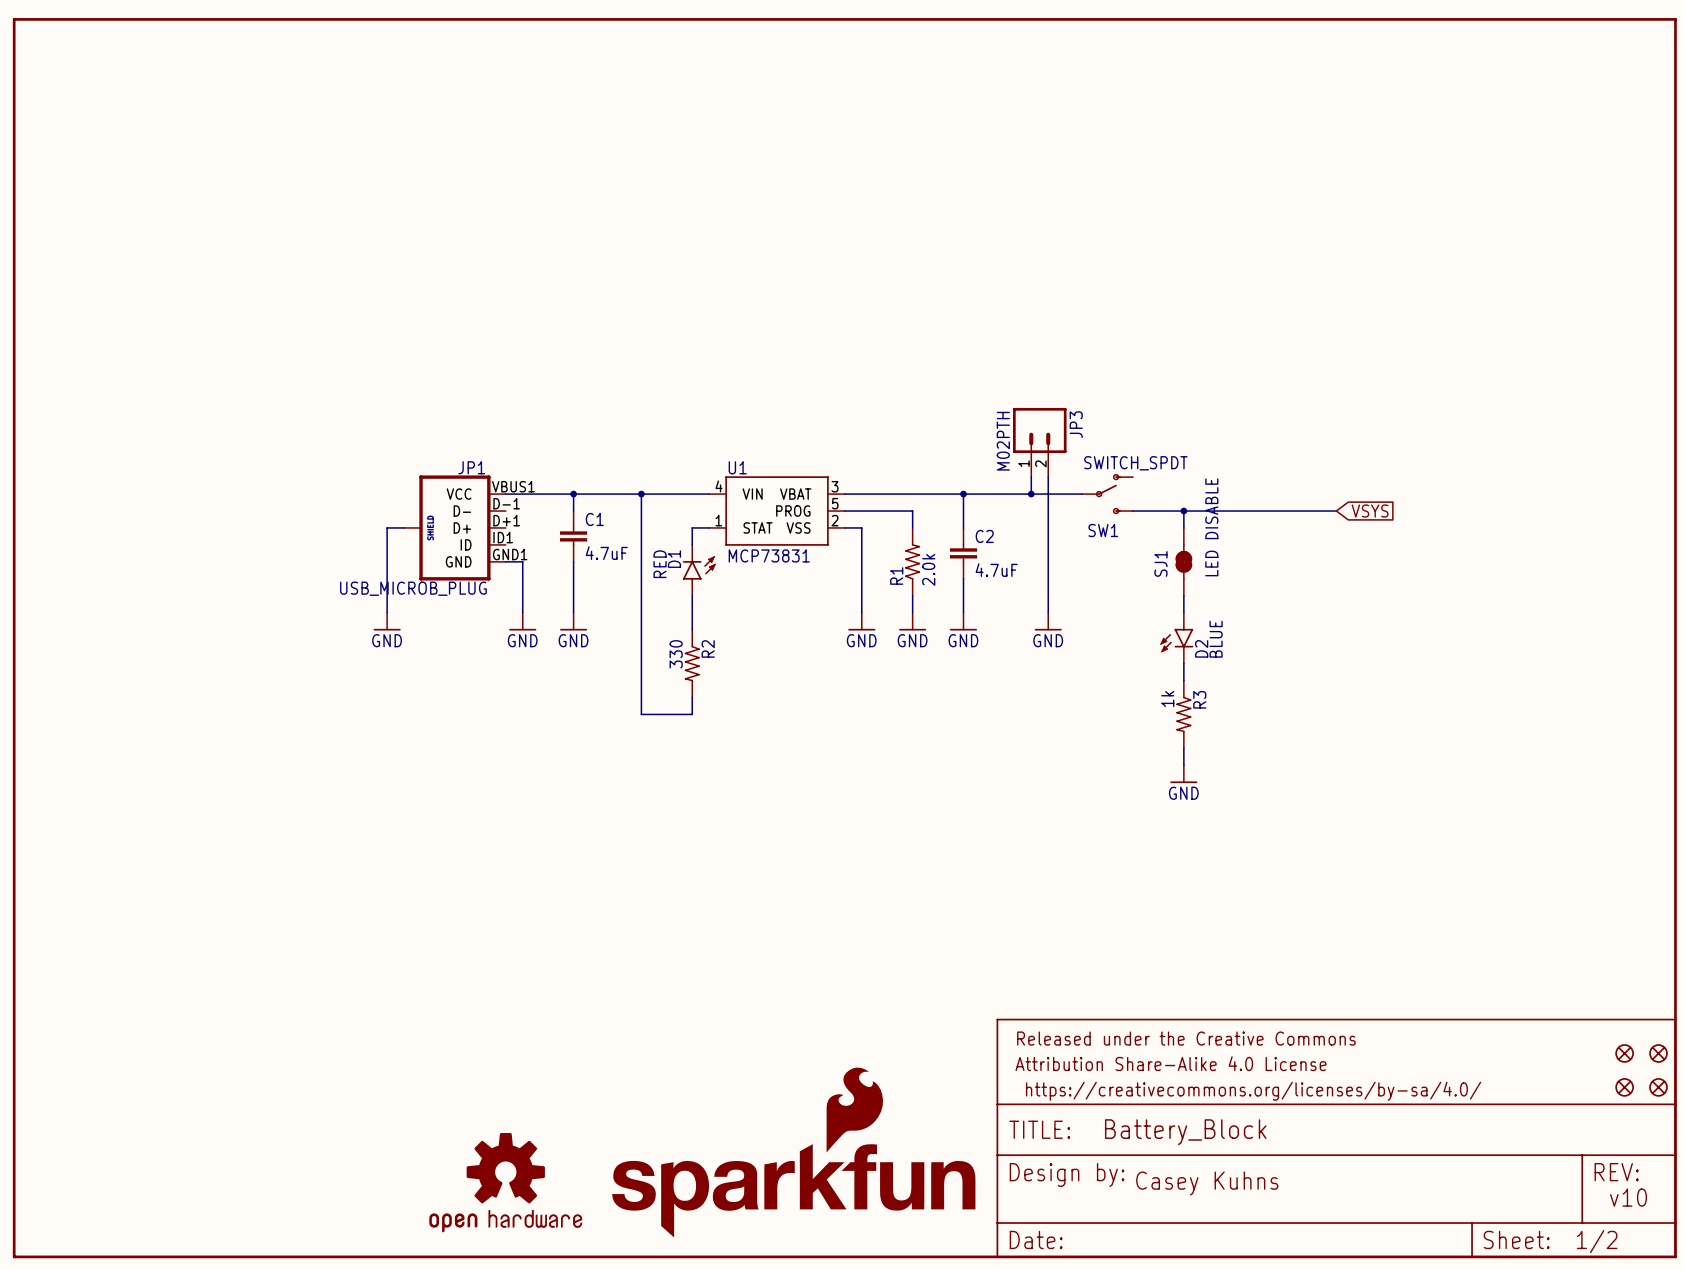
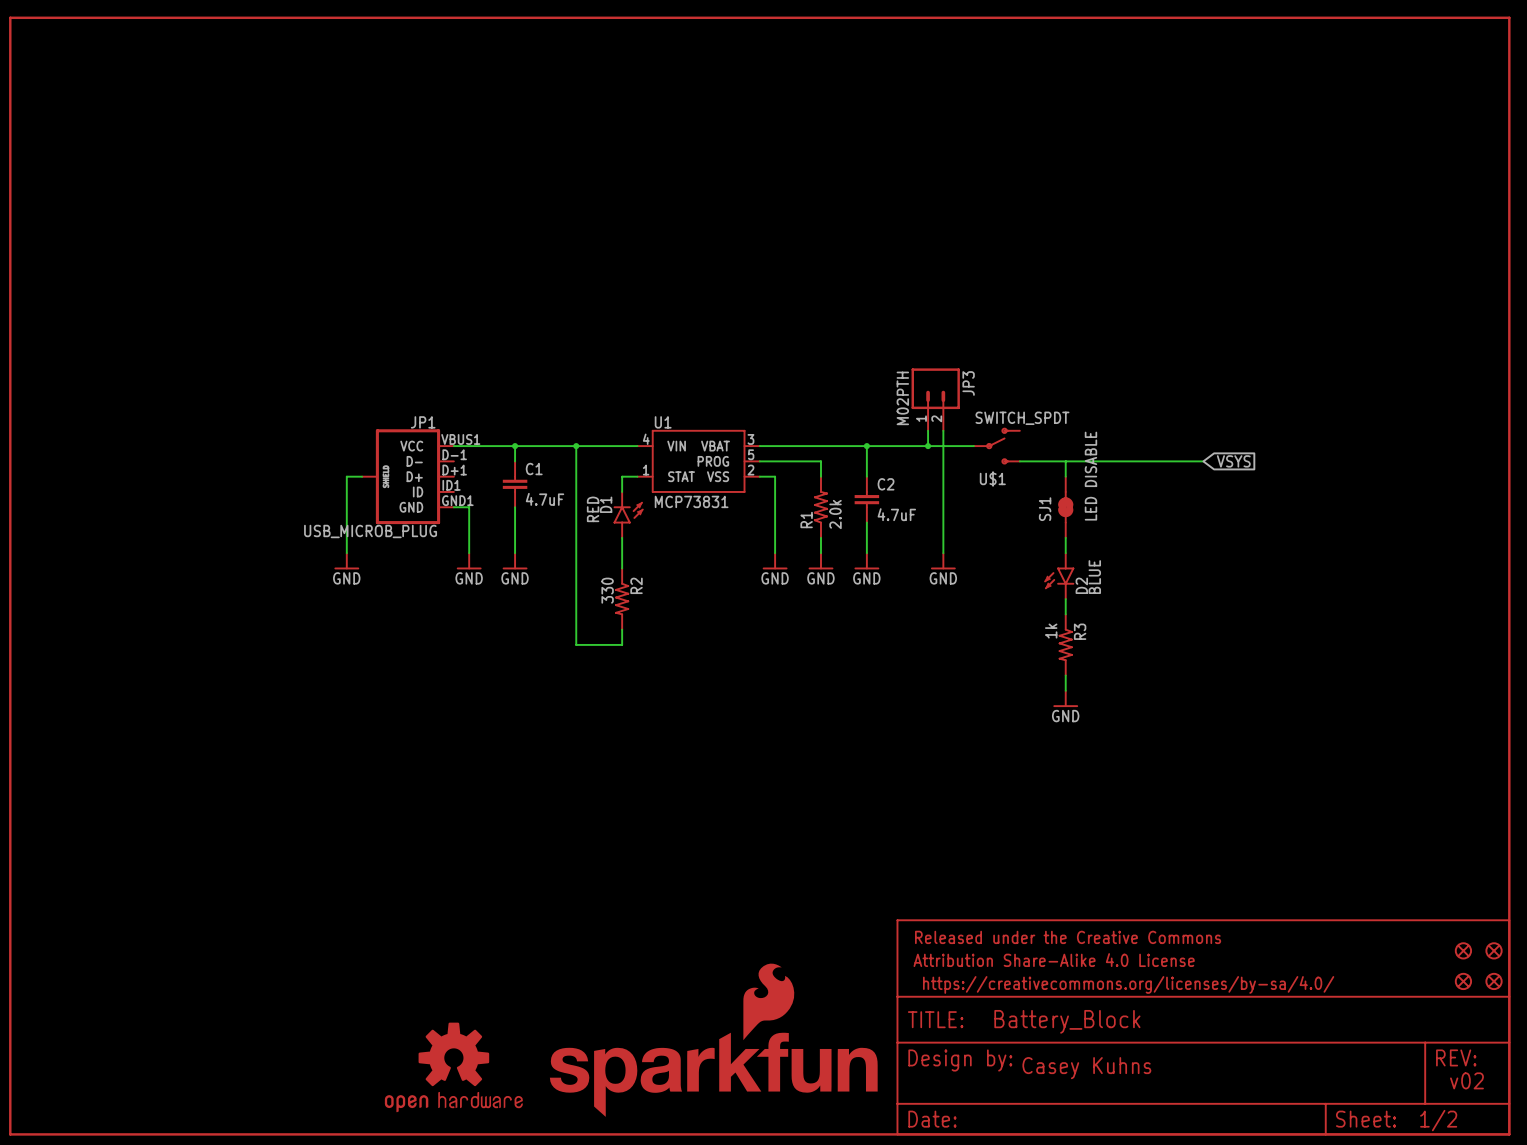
junction: (1183, 511) -> none
SW1 name: SW1 (1103, 530) -> U$1 (992, 478)
text: v10 (1628, 1197) -> v02 (1466, 1080)

